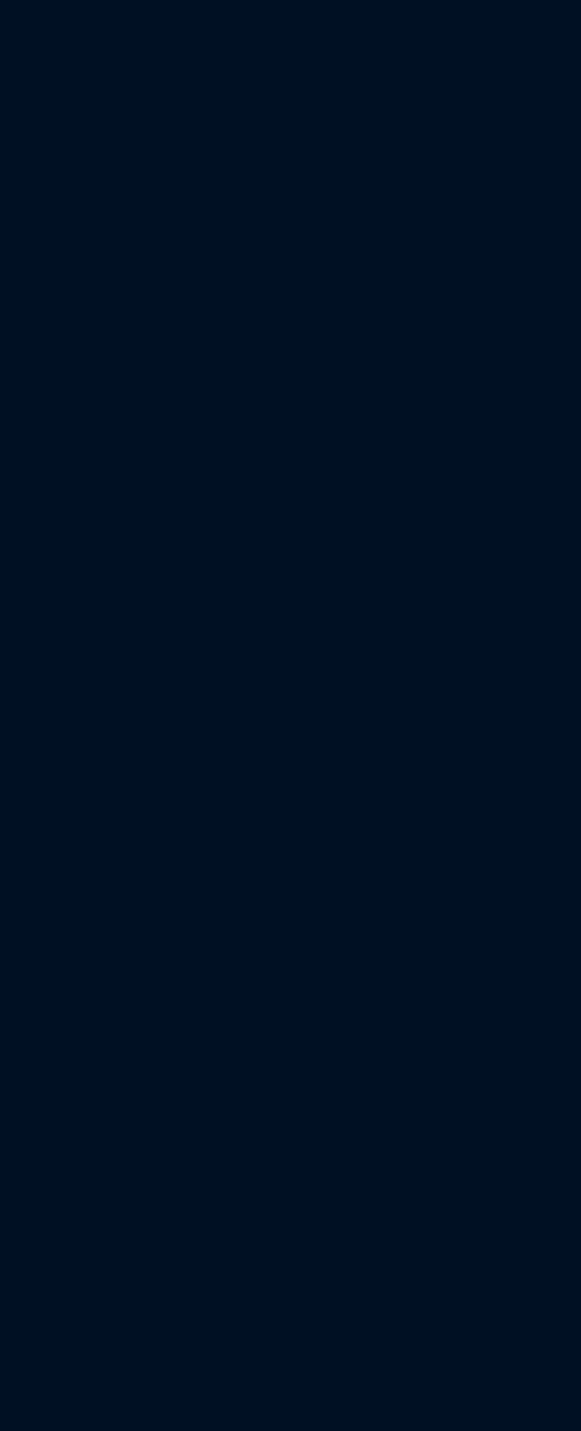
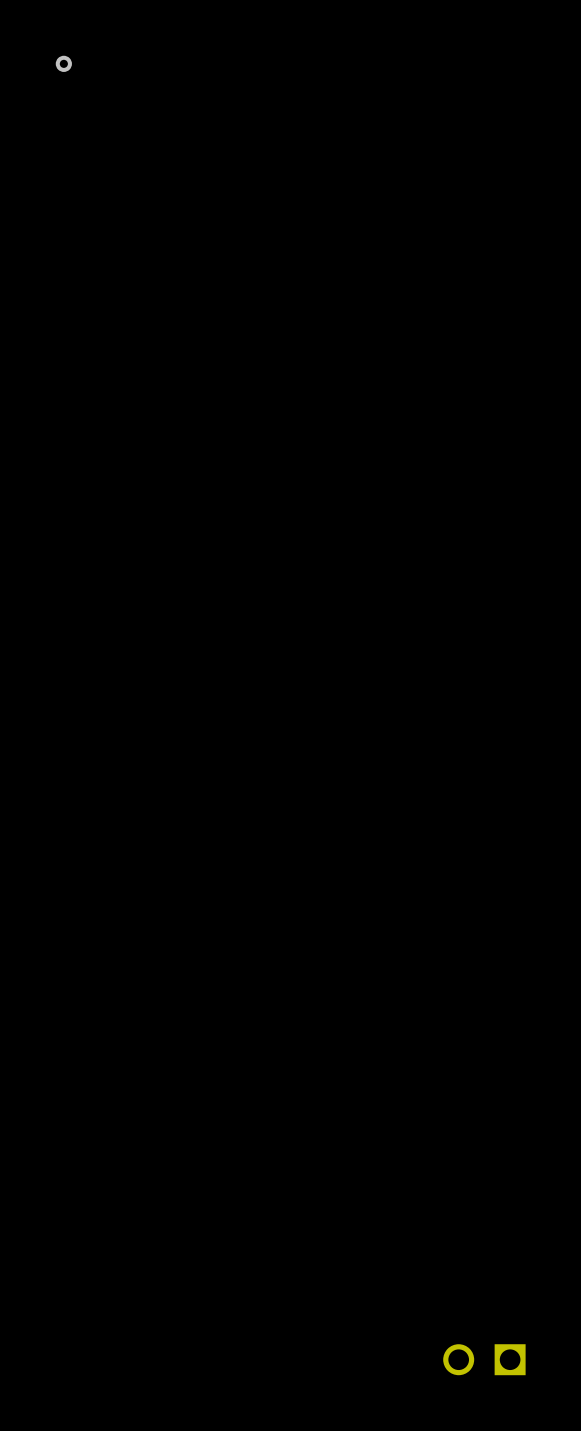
via: none -> (63, 63)
part: none -> (484, 1359)

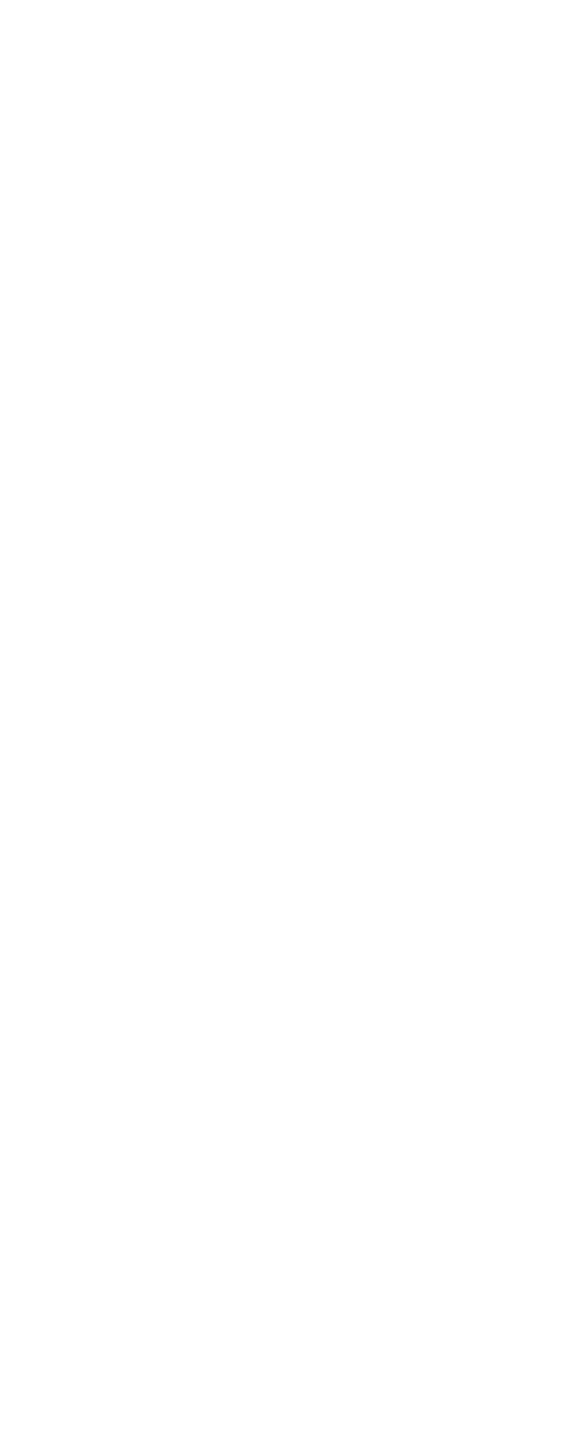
via: (63, 63) -> none
part: (484, 1359) -> none

